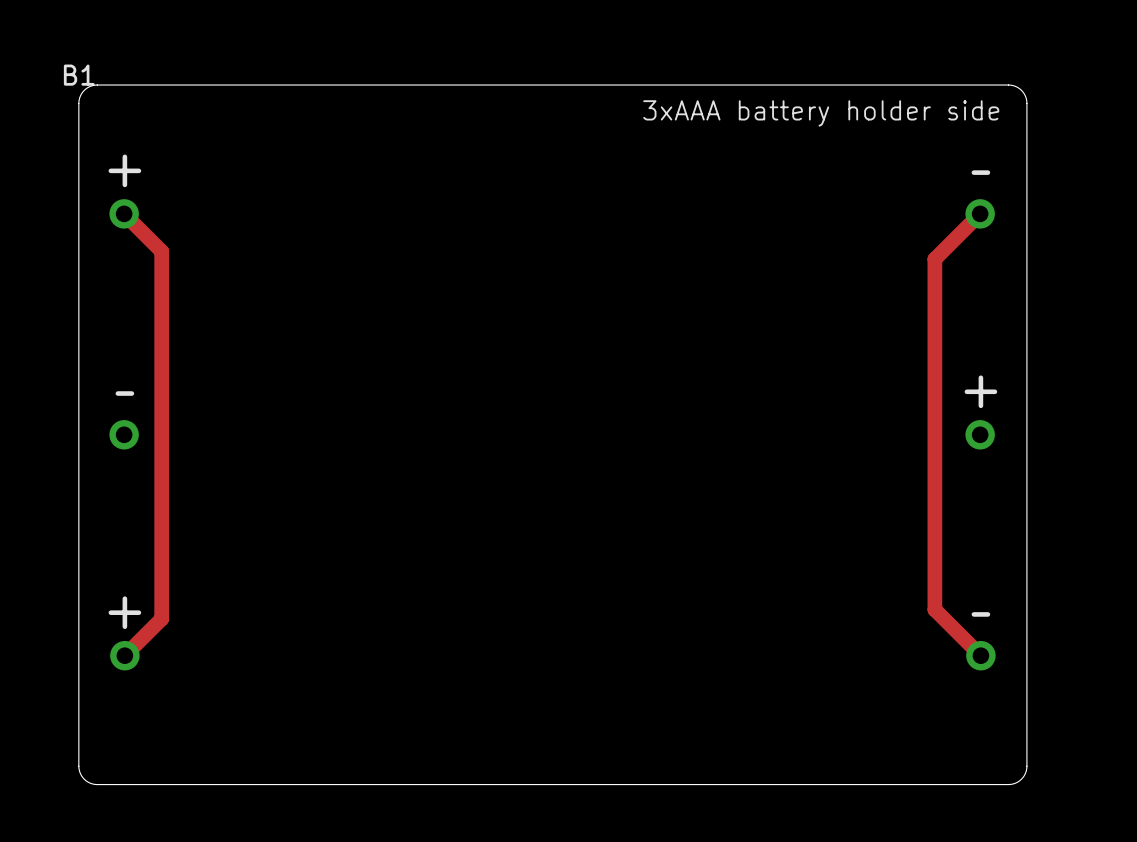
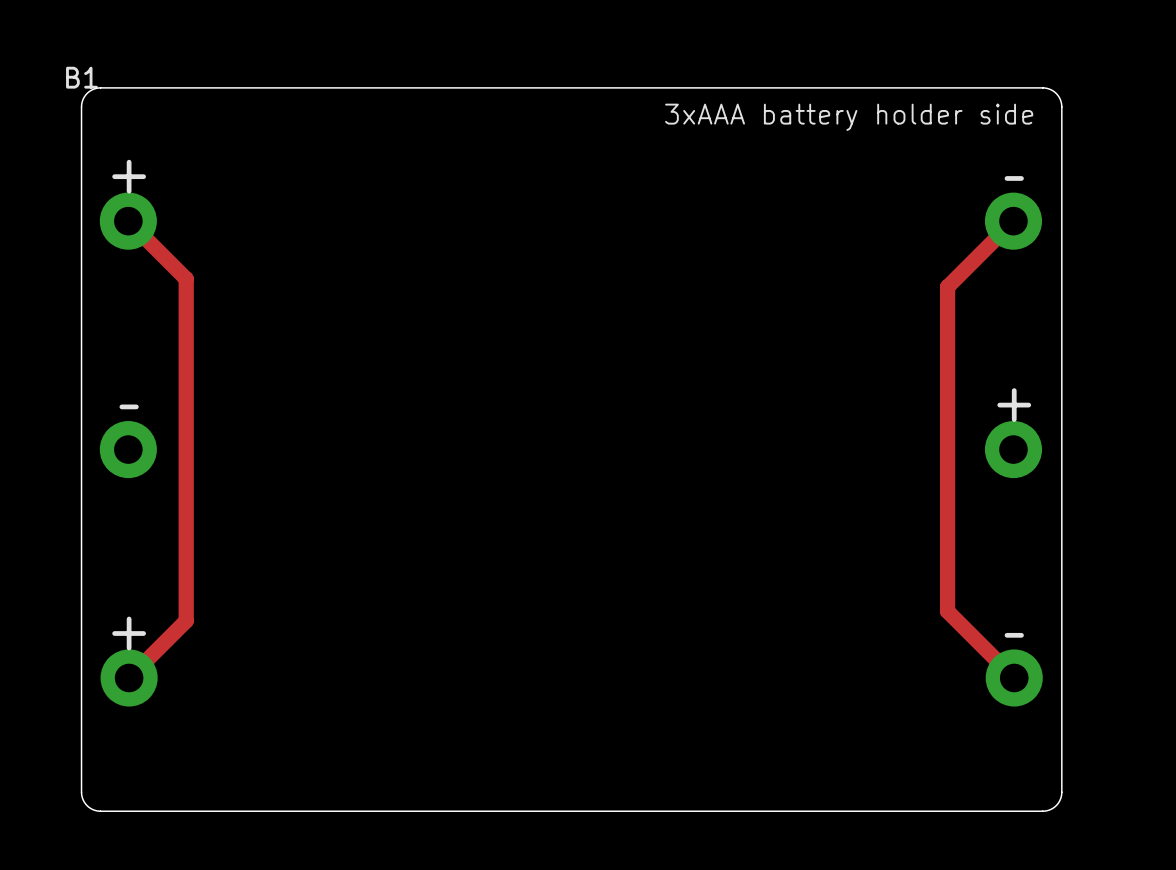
B1 footprint: [109, 199, 996, 671] -> [99, 192, 1043, 707]
track: (161, 251) (161, 618) -> (167, 259) (186, 279) (186, 620) (167, 639)
track: (934, 259) (934, 609) -> (966, 267) (947, 287) (947, 611) (966, 630)

